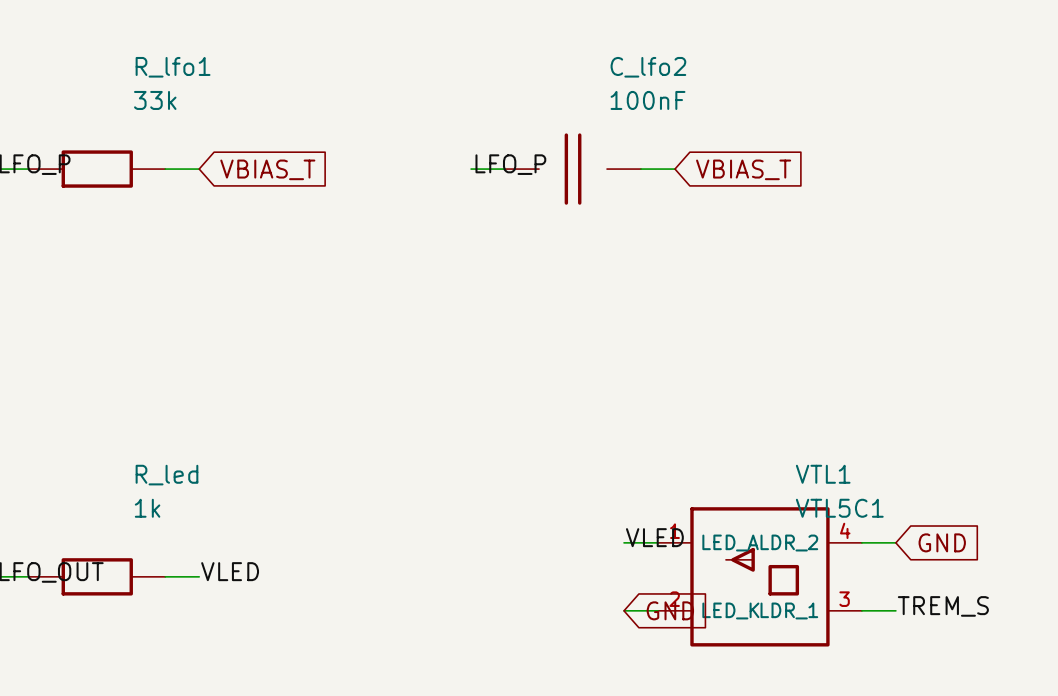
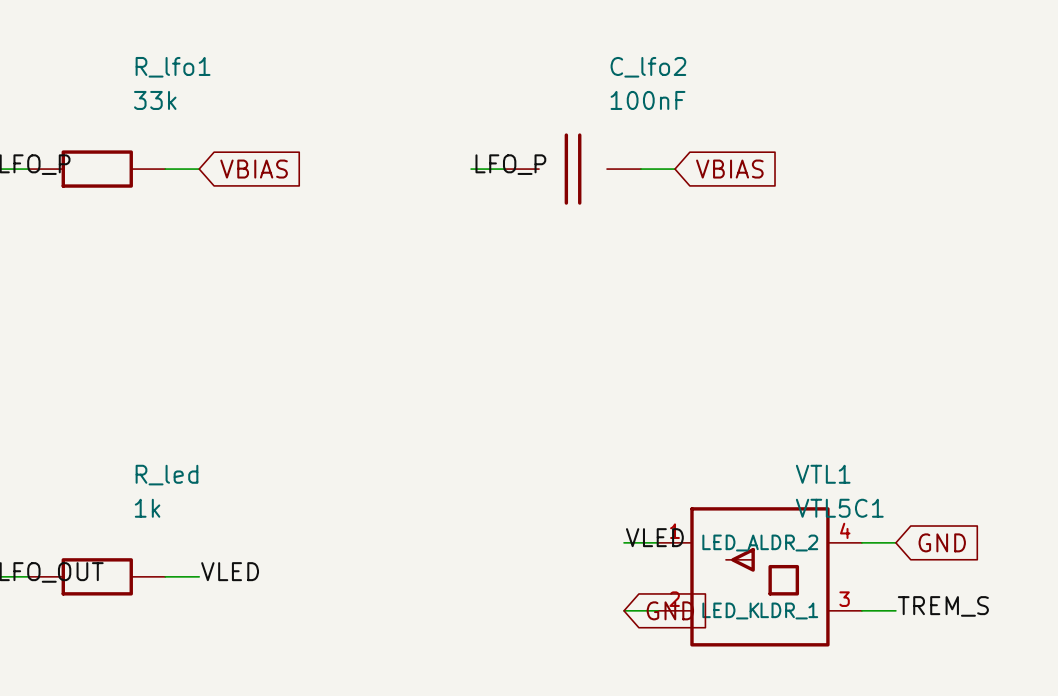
global label: VBIAS_T (267, 169) -> VBIAS (254, 169)
global label: VBIAS_T (743, 169) -> VBIAS (729, 169)

